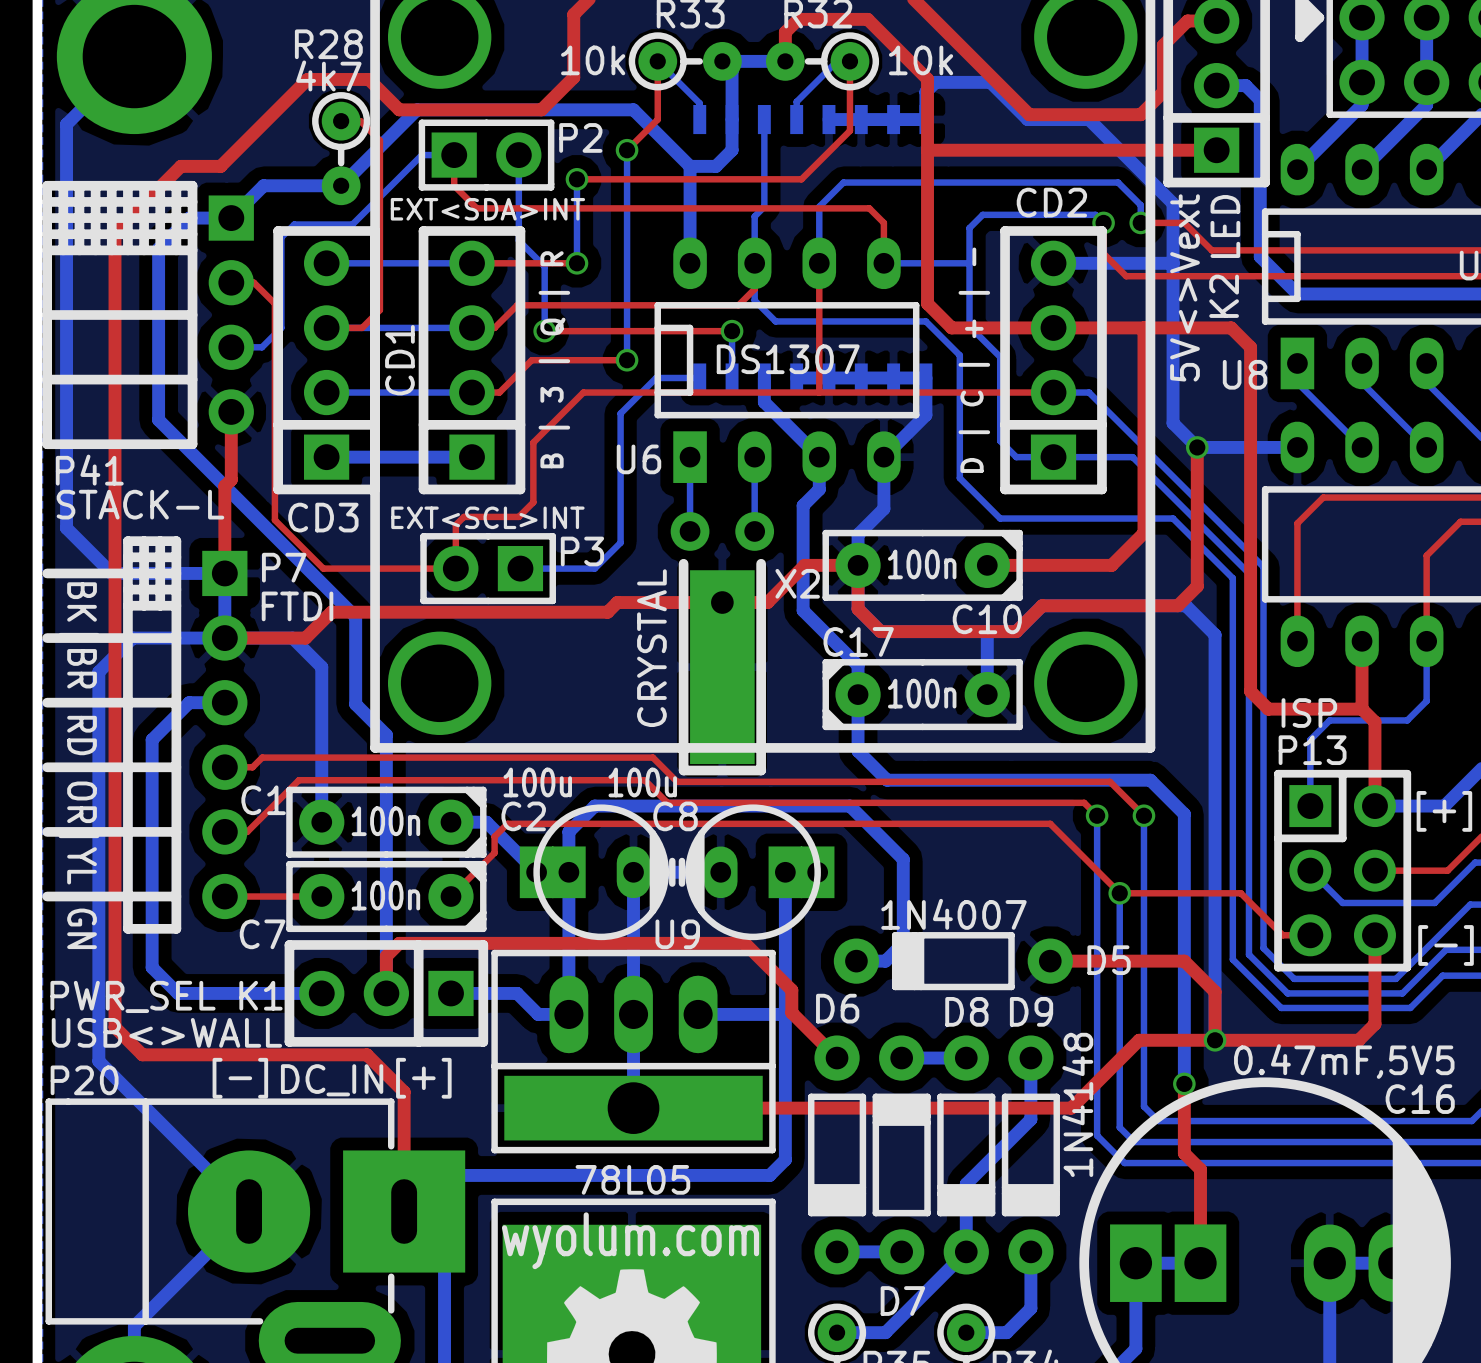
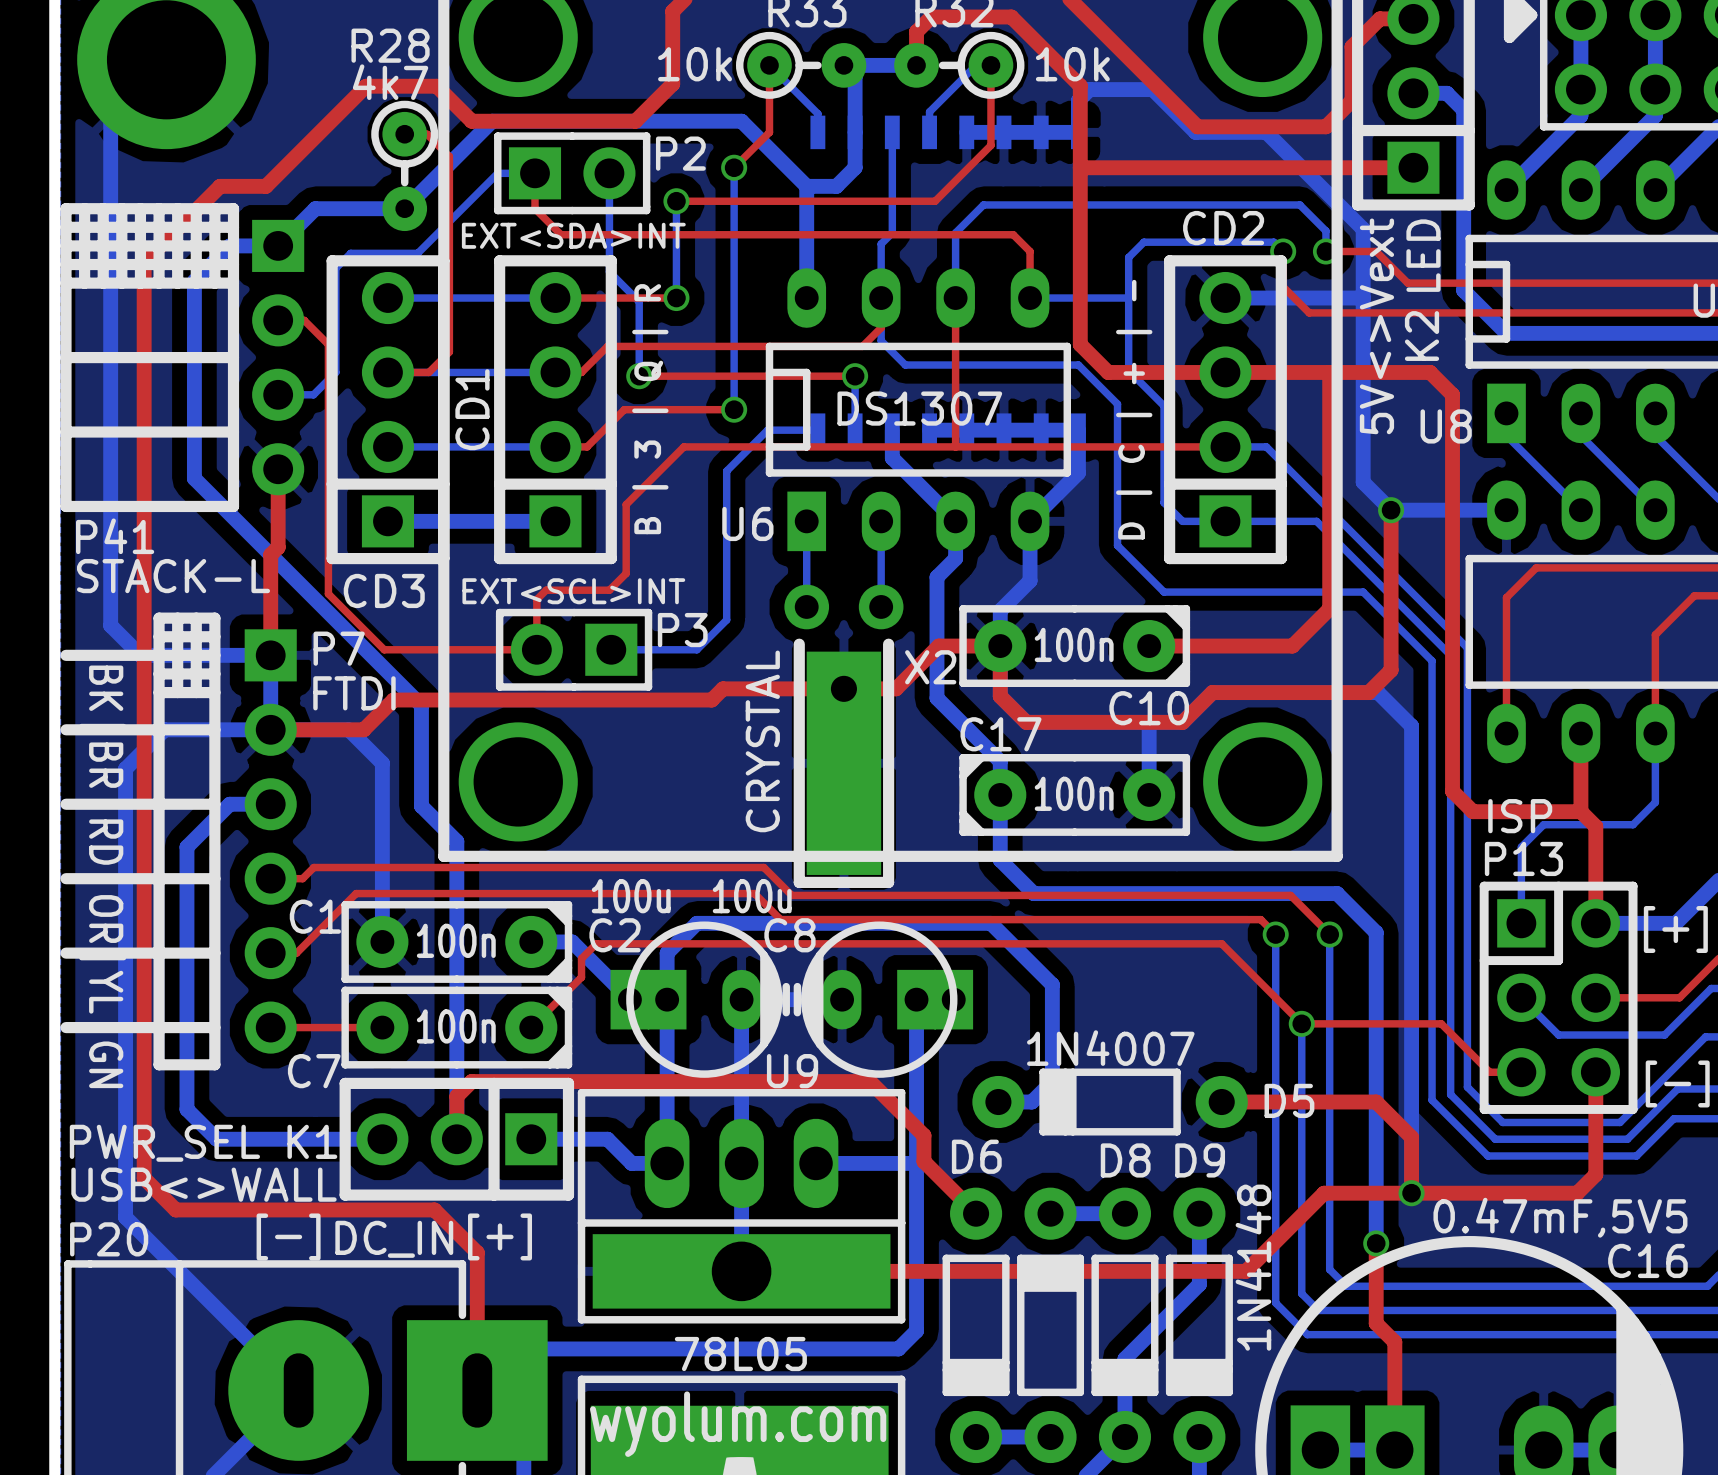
bottom track: (85, 105) (66, 124) (66, 528) (85, 547) -> (110, 115) (110, 625)

